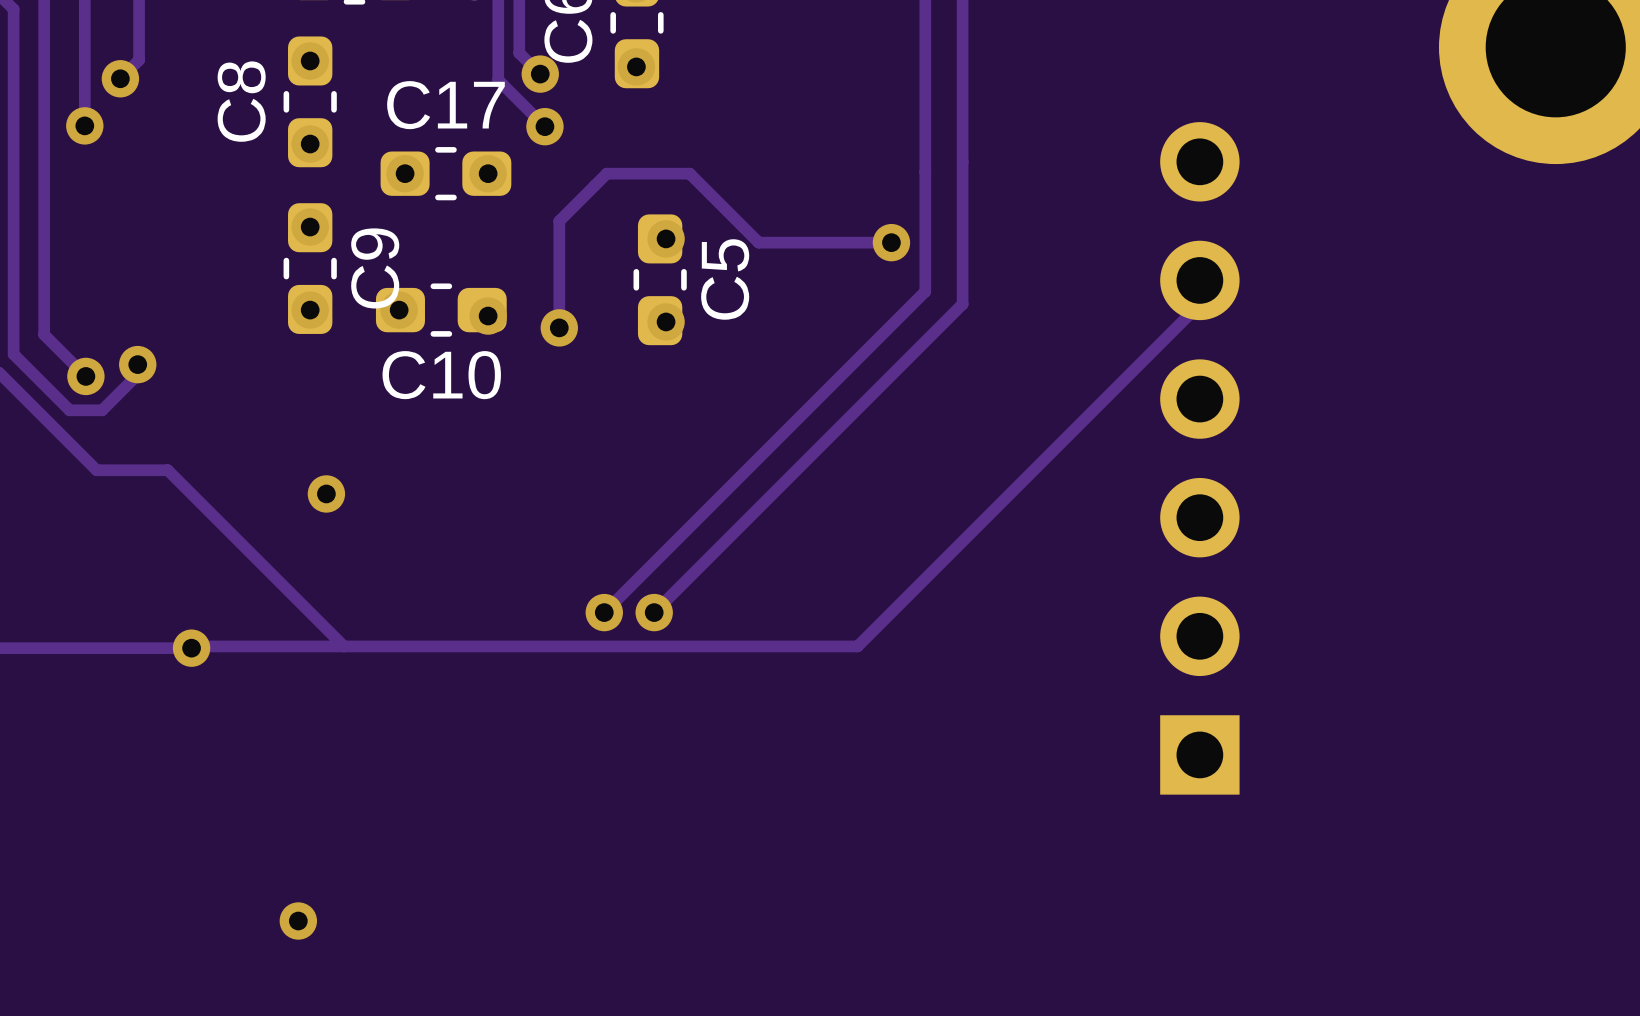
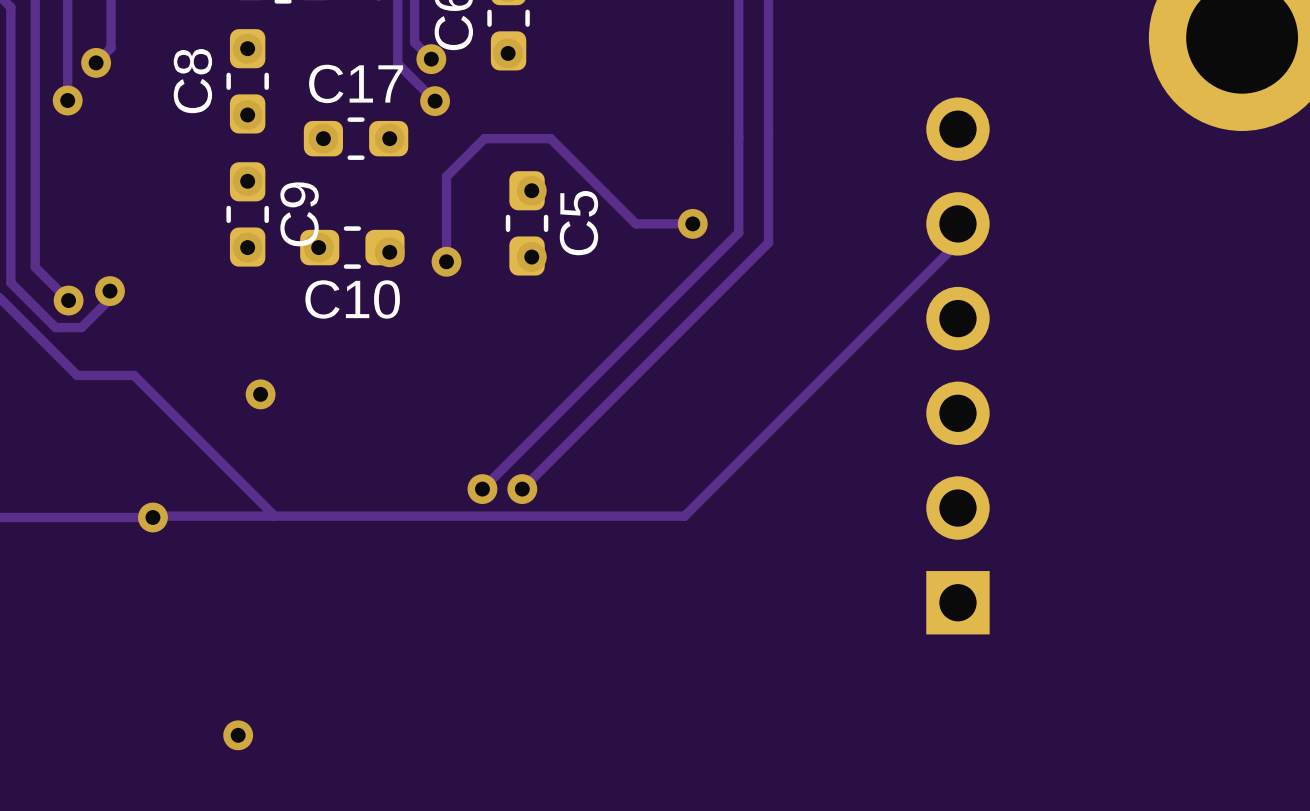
track: (758, 242) (891, 242) -> (605, 193) (635, 223) (692, 223)
via position: (891, 242) -> (692, 223)

